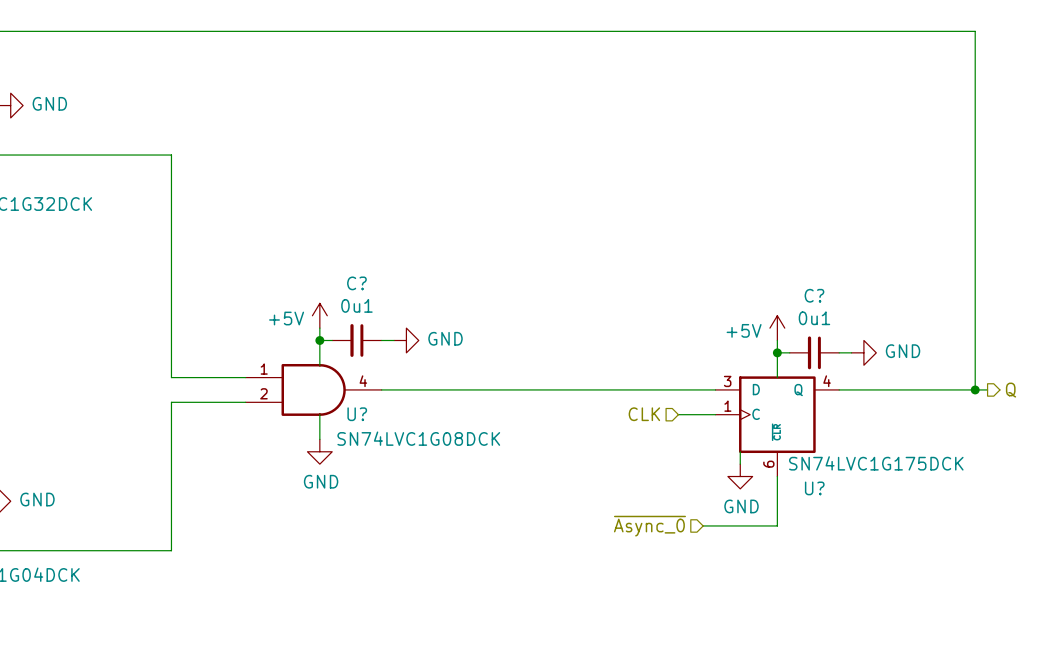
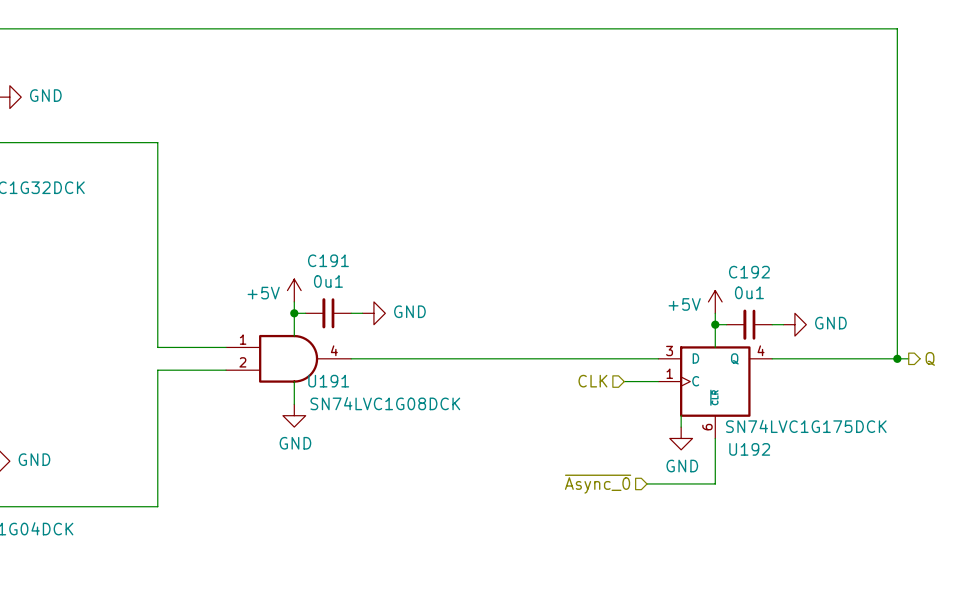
C? name: C? (356, 283) -> C191 (328, 260)
C? name: C? (814, 295) -> C192 (749, 272)
U? name: U? (357, 414) -> U191 (328, 381)
U? name: U? (814, 488) -> U192 (749, 449)

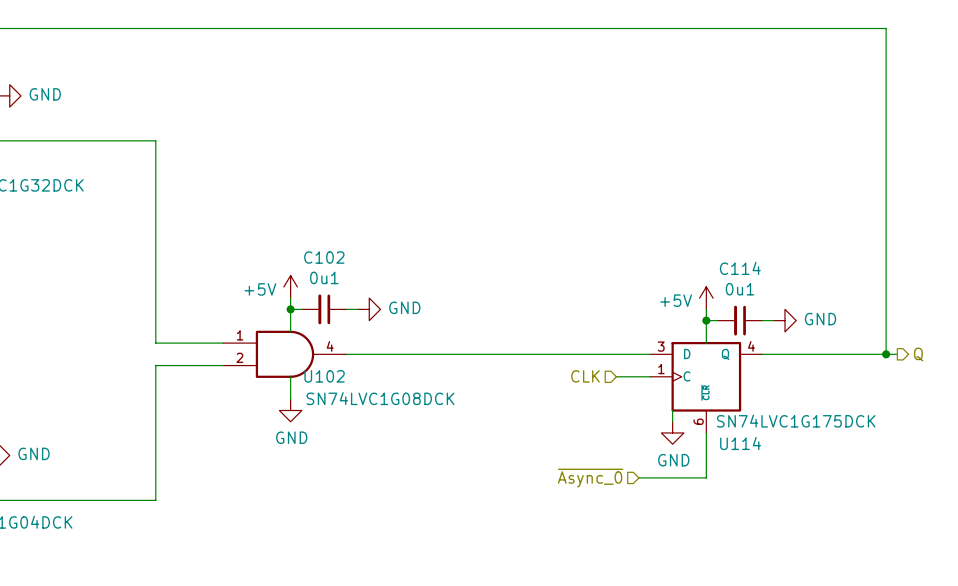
C191 name: C191 (328, 260) -> C102 (324, 257)
C192 name: C192 (749, 272) -> C114 (740, 268)
U191 name: U191 (328, 381) -> U102 (324, 376)
U192 name: U192 (749, 449) -> U114 (740, 443)

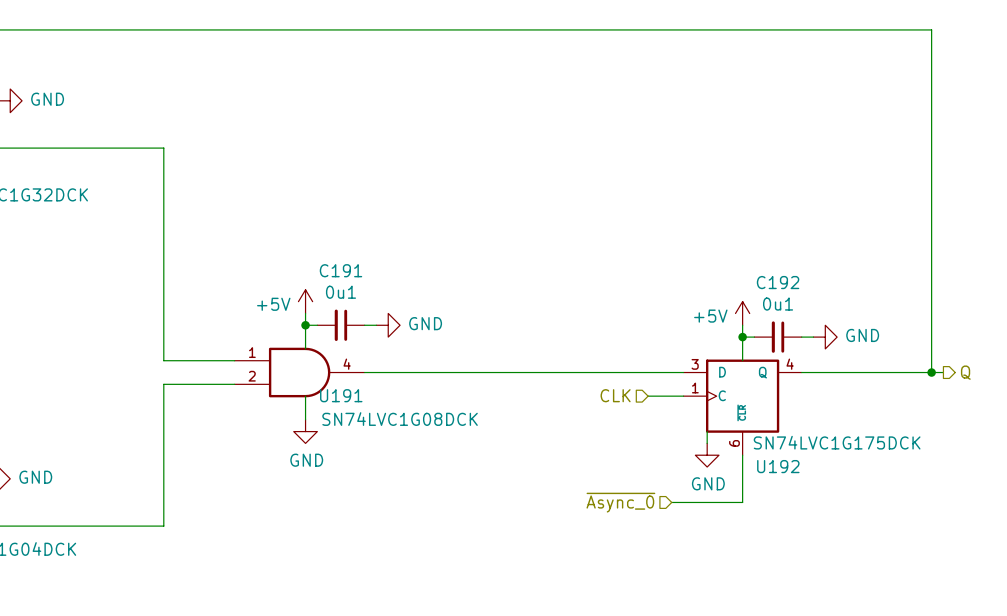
C102 name: C102 (324, 257) -> C191 (340, 270)
C114 name: C114 (740, 268) -> C192 (778, 282)
U102 name: U102 (324, 376) -> U191 (341, 395)
U114 name: U114 (740, 443) -> U192 (778, 466)

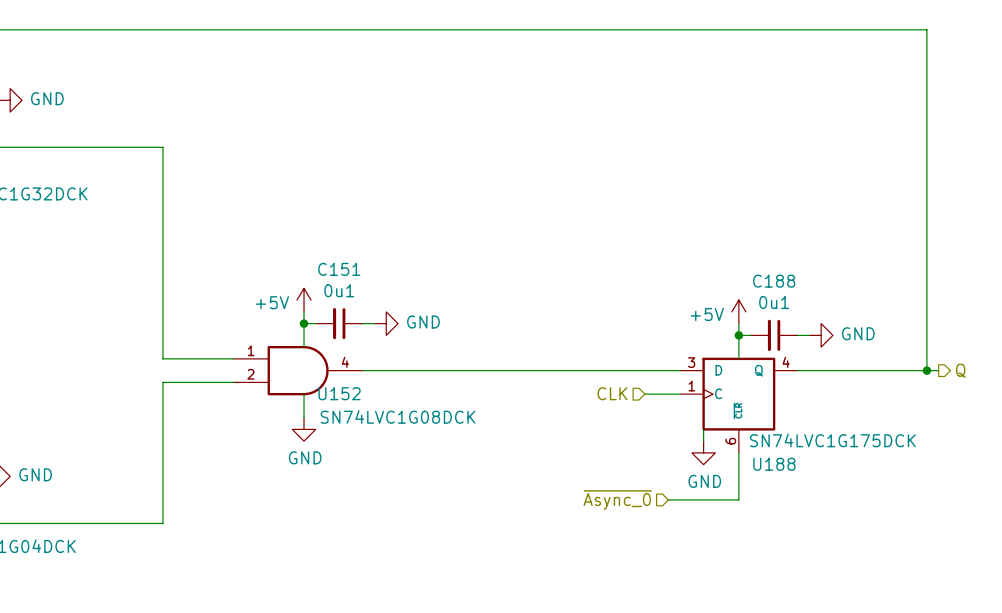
C191 name: C191 (340, 270) -> C151 (339, 269)
C192 name: C192 (778, 282) -> C188 (774, 281)
U191 name: U191 (341, 395) -> U152 (339, 393)
U192 name: U192 (778, 466) -> U188 (774, 464)

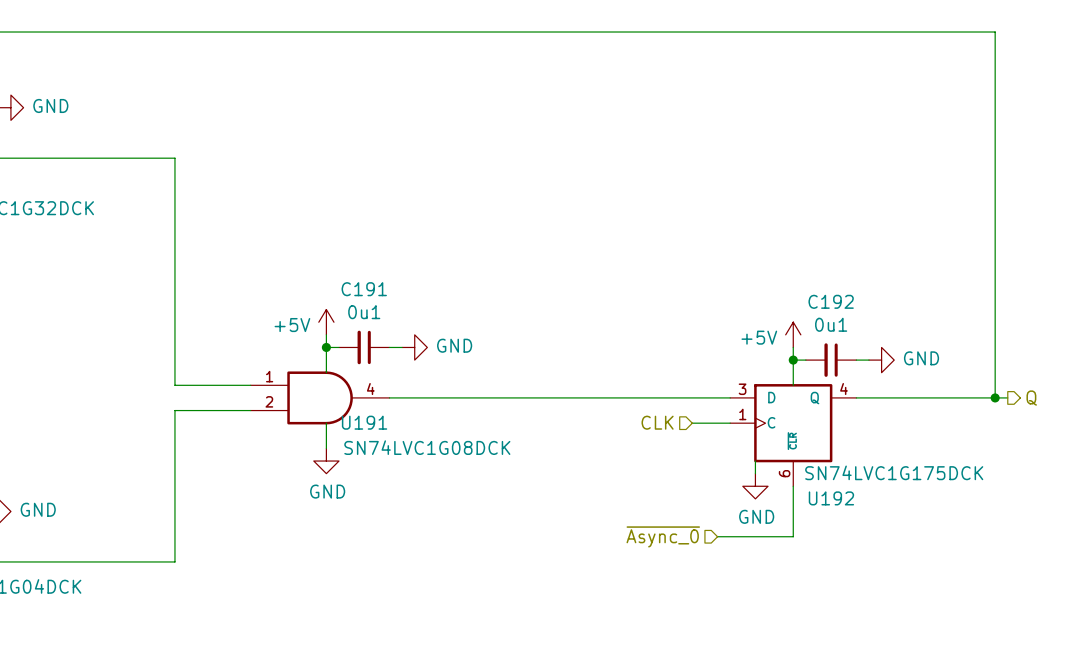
C151 name: C151 (339, 269) -> C191 (364, 289)
C188 name: C188 (774, 281) -> C192 (831, 301)
U152 name: U152 (339, 393) -> U191 (364, 422)
U188 name: U188 (774, 464) -> U192 (831, 498)

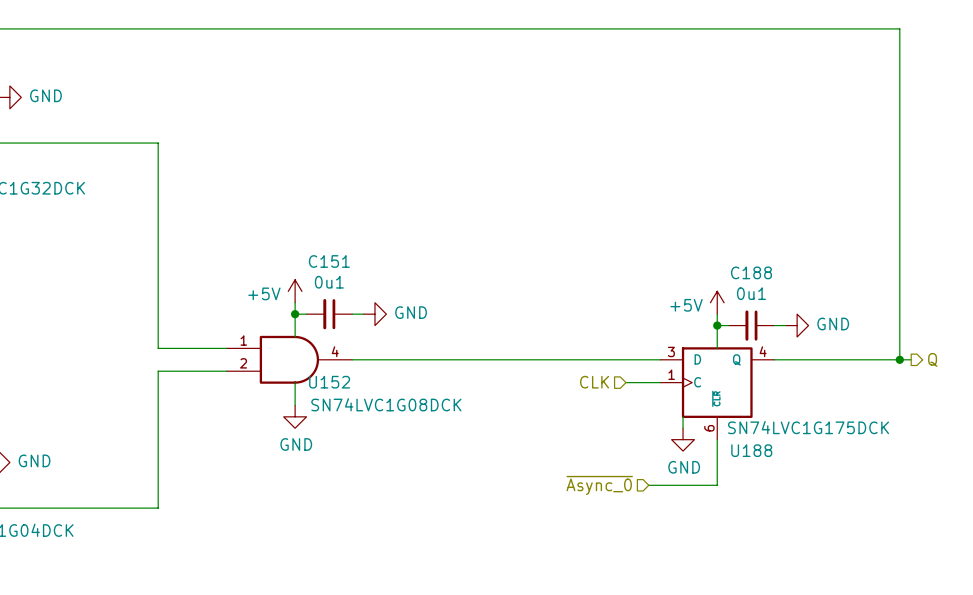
C191 name: C191 (364, 289) -> C151 (329, 261)
C192 name: C192 (831, 301) -> C188 (751, 272)
U191 name: U191 (364, 422) -> U152 (329, 382)
U192 name: U192 (831, 498) -> U188 (751, 450)

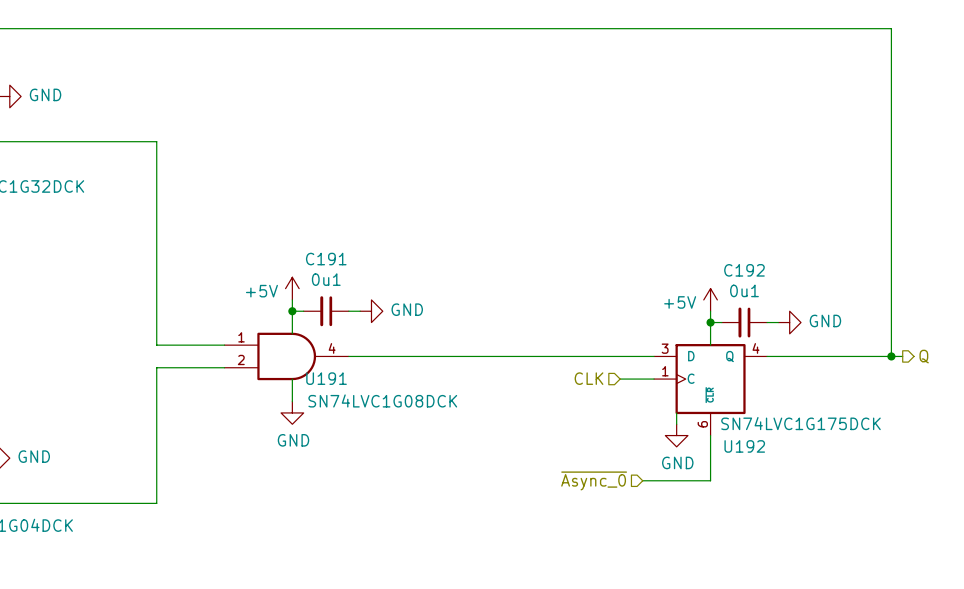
C151 name: C151 (329, 261) -> C191 (326, 259)
C188 name: C188 (751, 272) -> C192 (744, 270)
U152 name: U152 (329, 382) -> U191 (326, 378)
U188 name: U188 (751, 450) -> U192 (744, 446)

